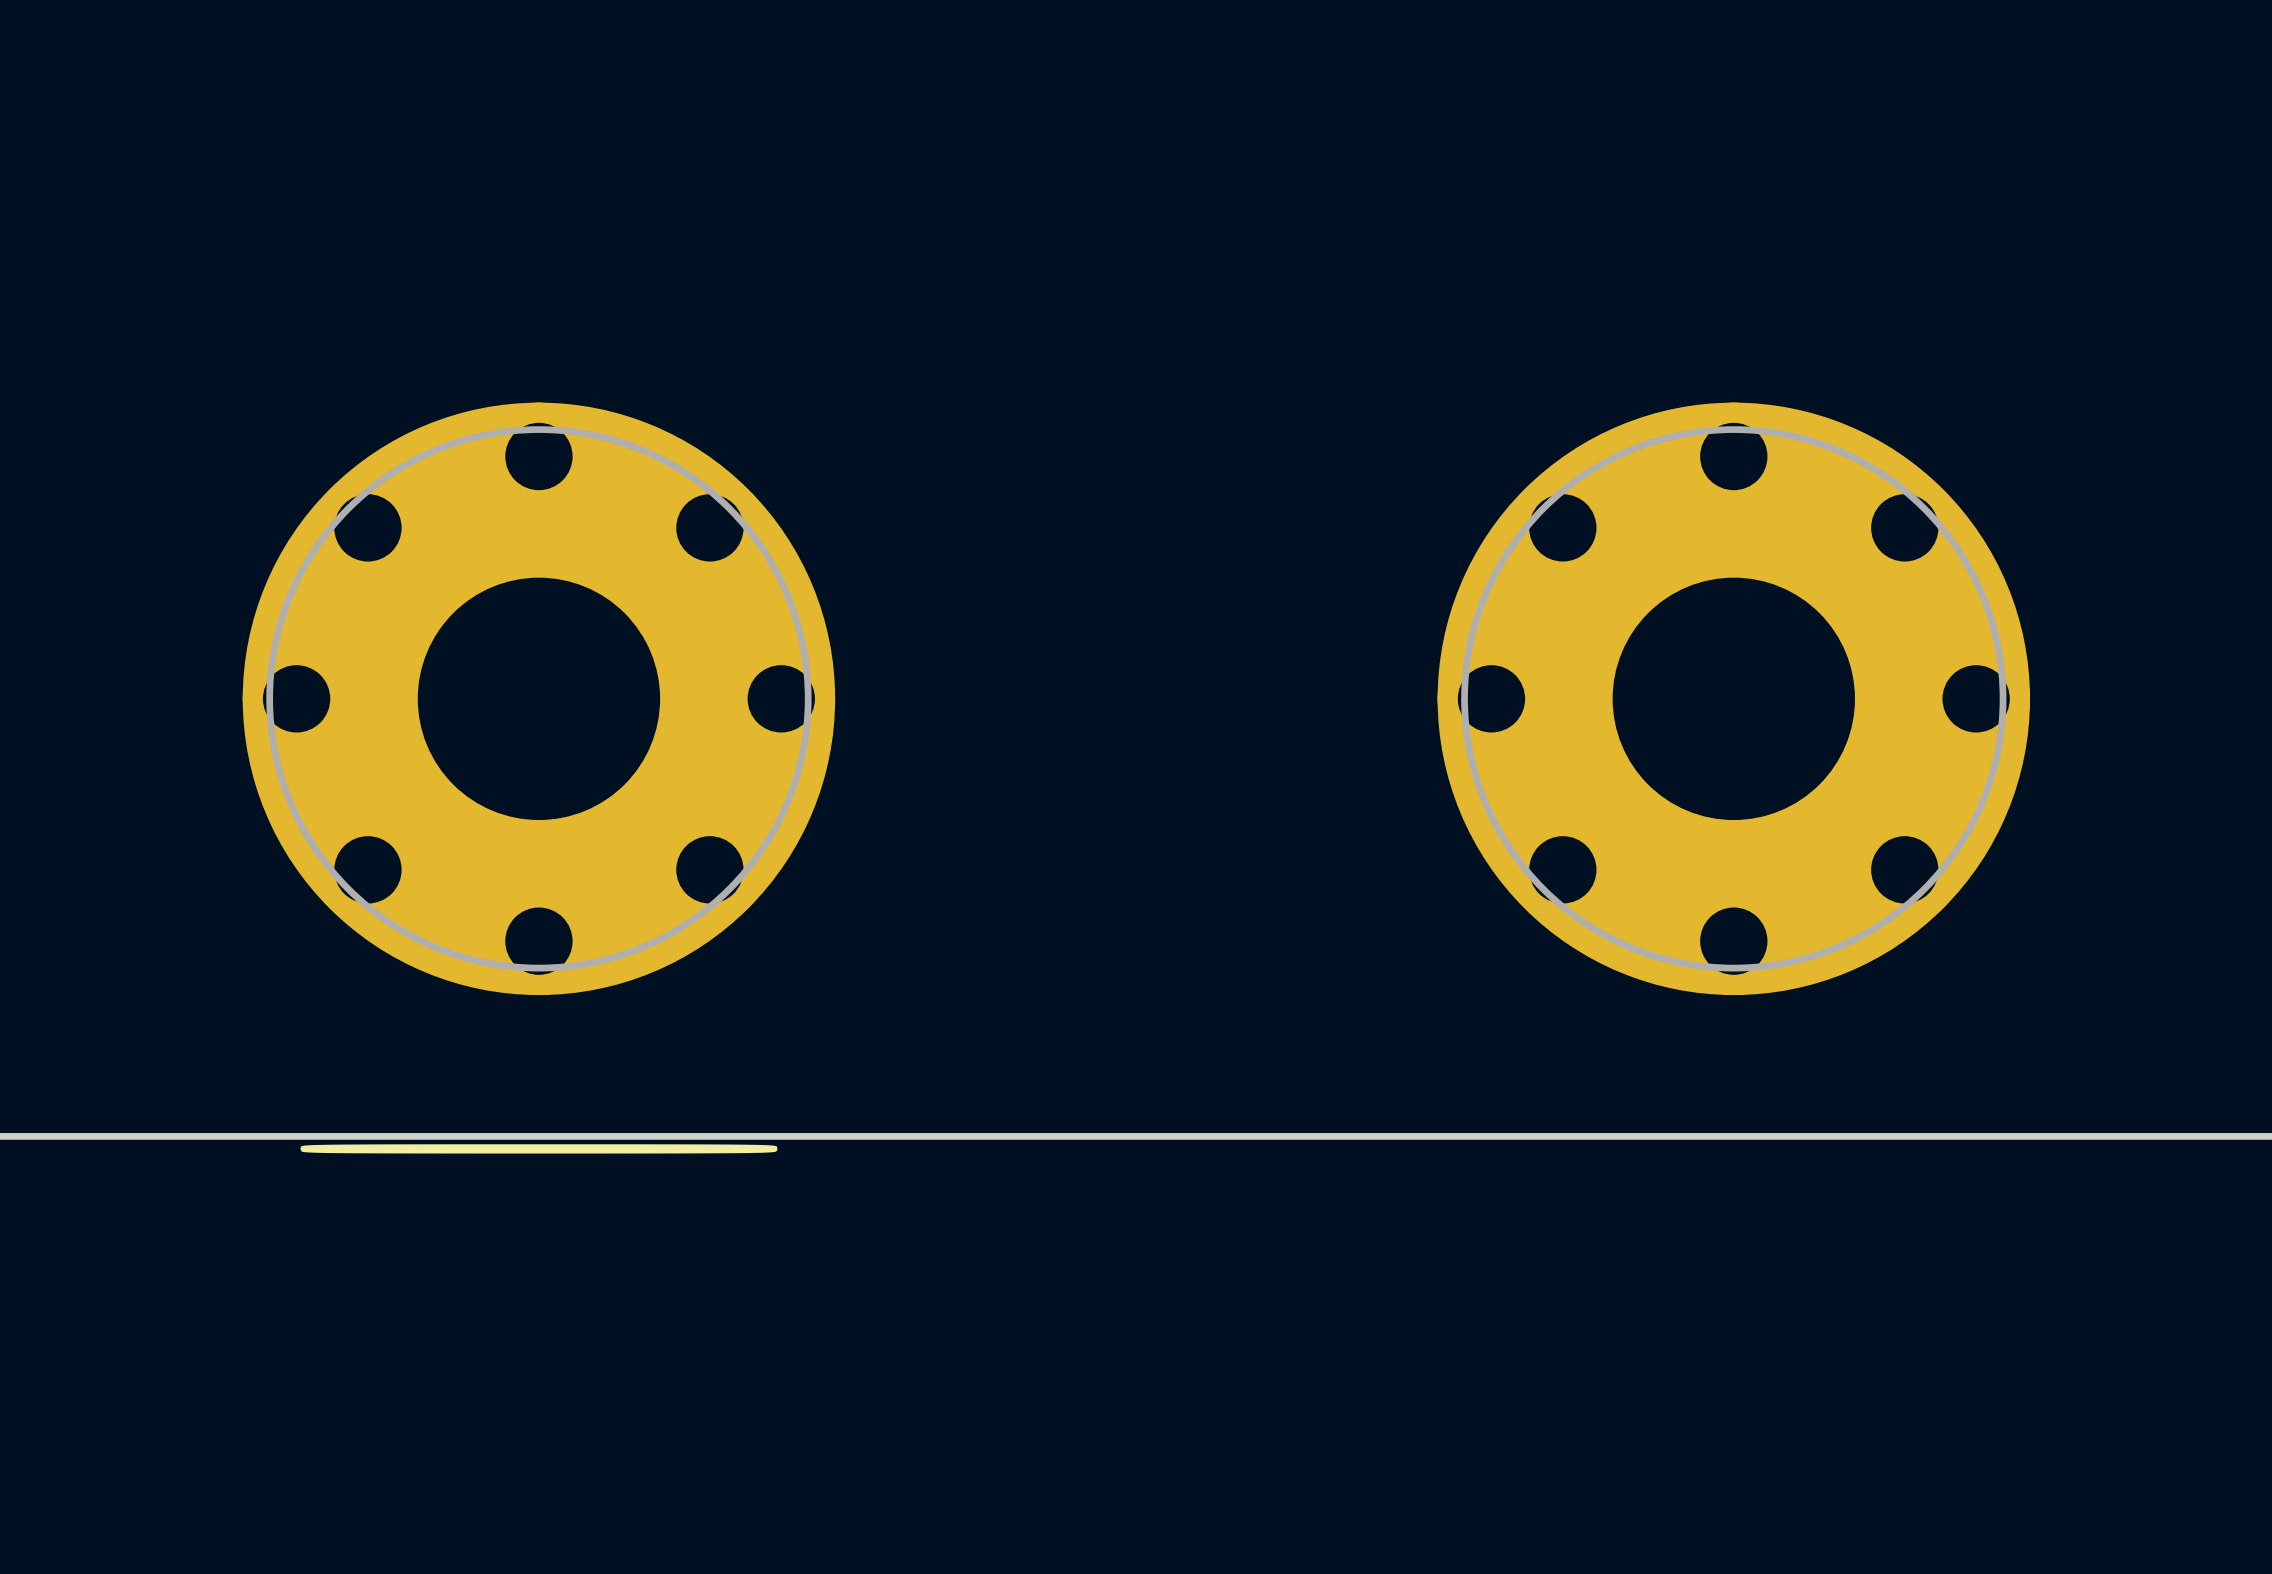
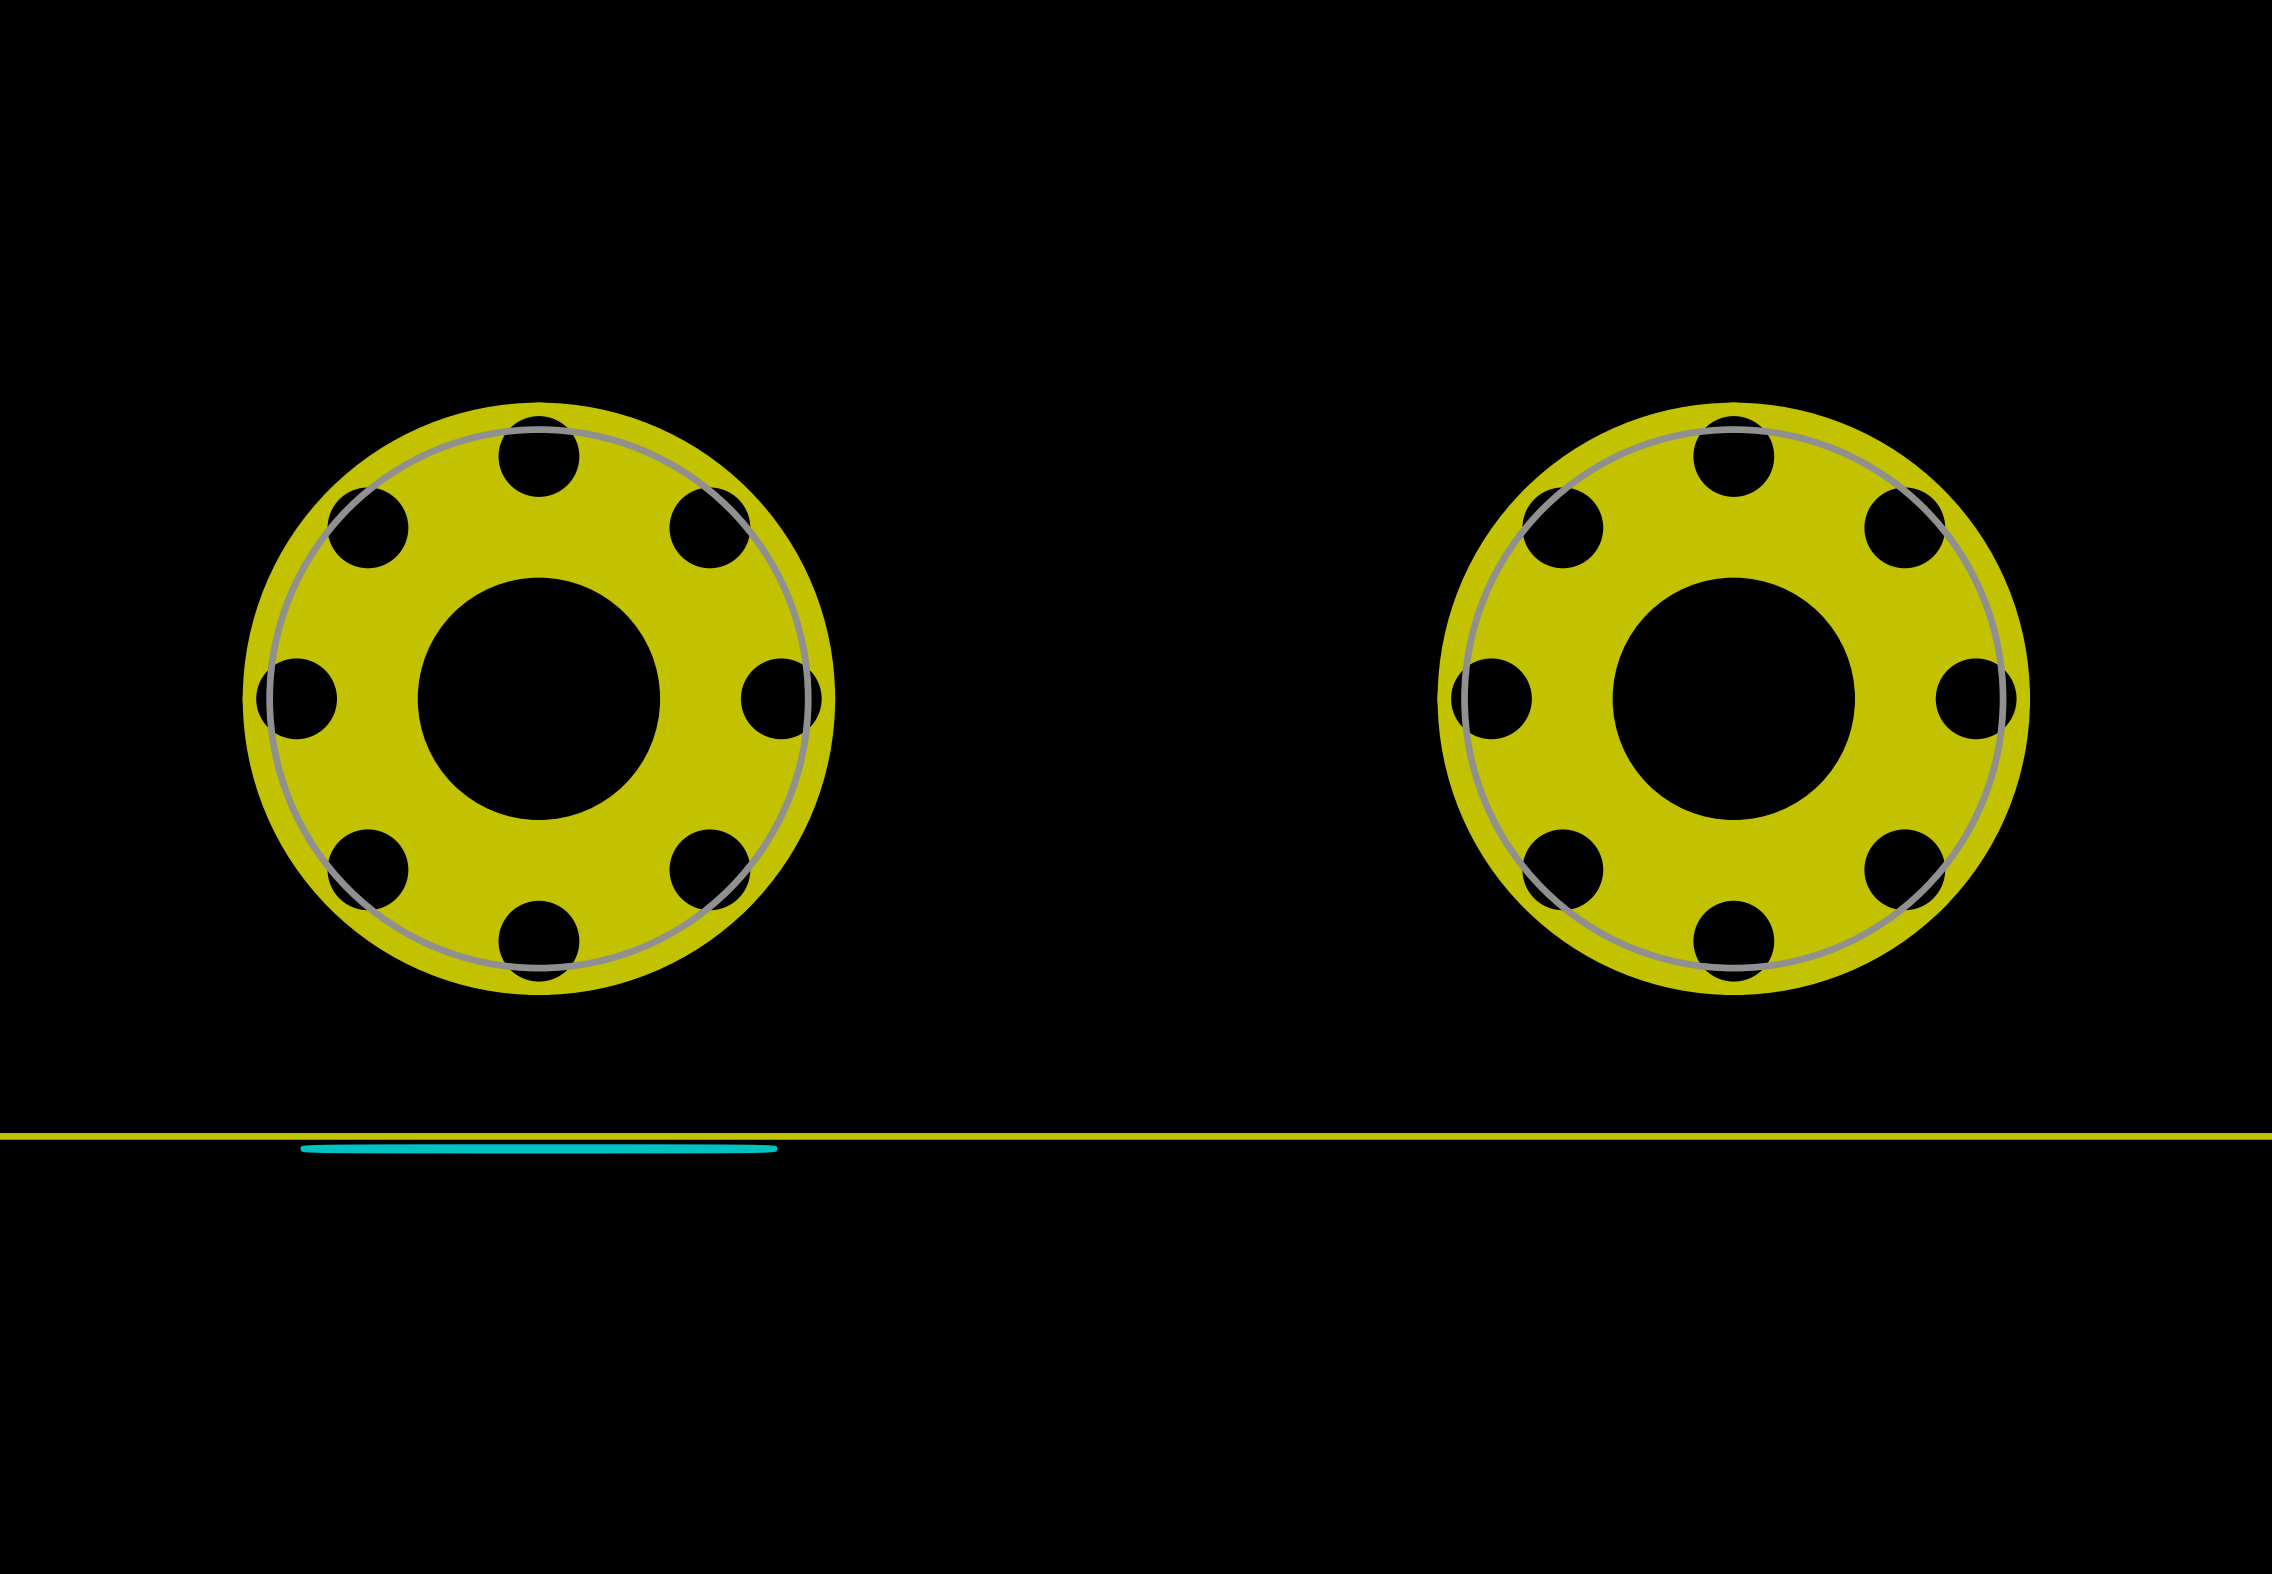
part footprint: [242, 402, 836, 996] -> [242, 402, 836, 996]
part footprint: [1437, 402, 2030, 996] -> [1437, 402, 2030, 996]

